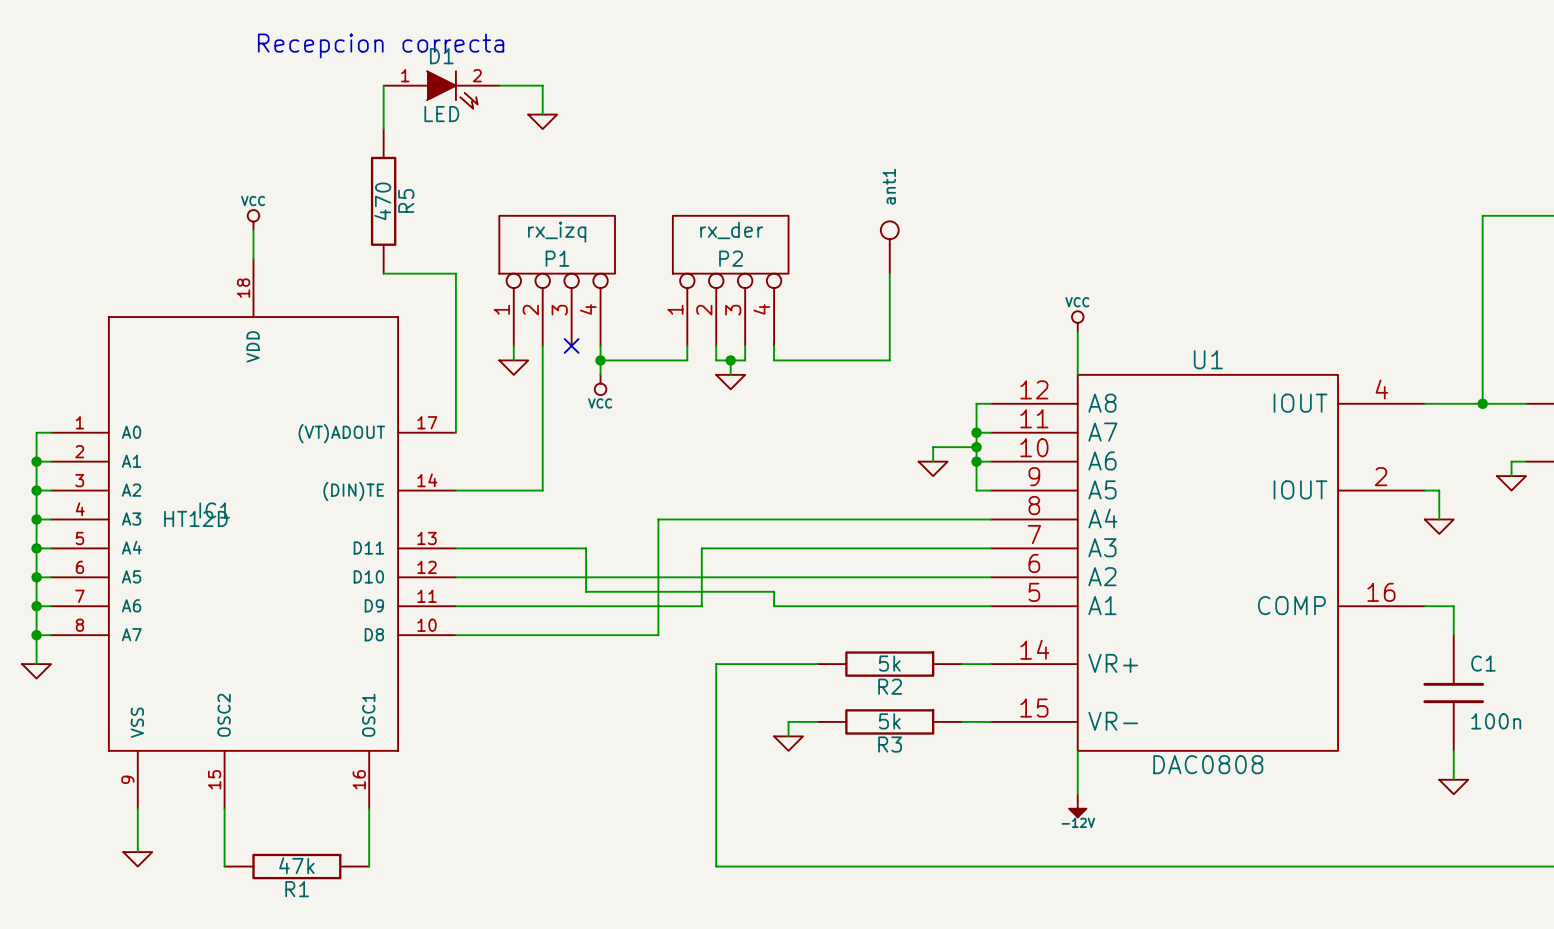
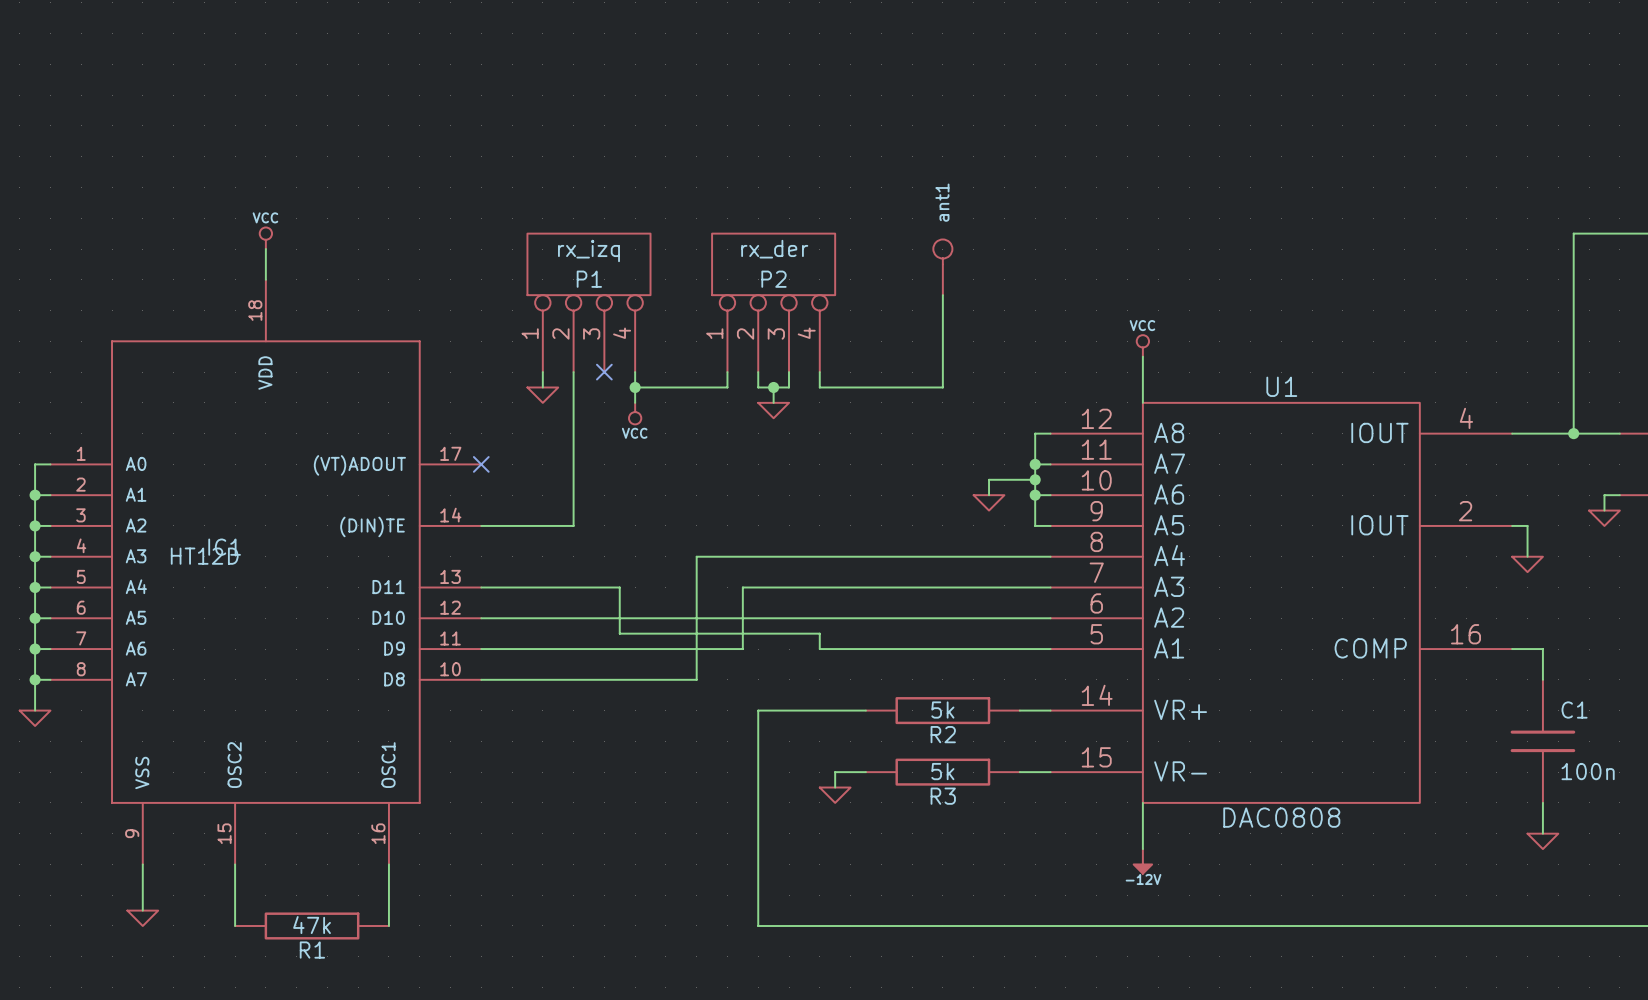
text: Recepcion correcta (381, 45) -> none
wire: (383, 85) (383, 129) -> none
wire: (499, 85) (542, 85) (542, 114) -> none
D1: LED (441, 90) -> none
power symbol: (542, 121) -> none
R5: 470 (383, 201) -> none
wire: (383, 273) (455, 273) (455, 432) -> none
no-connect mark: none -> (481, 464)

